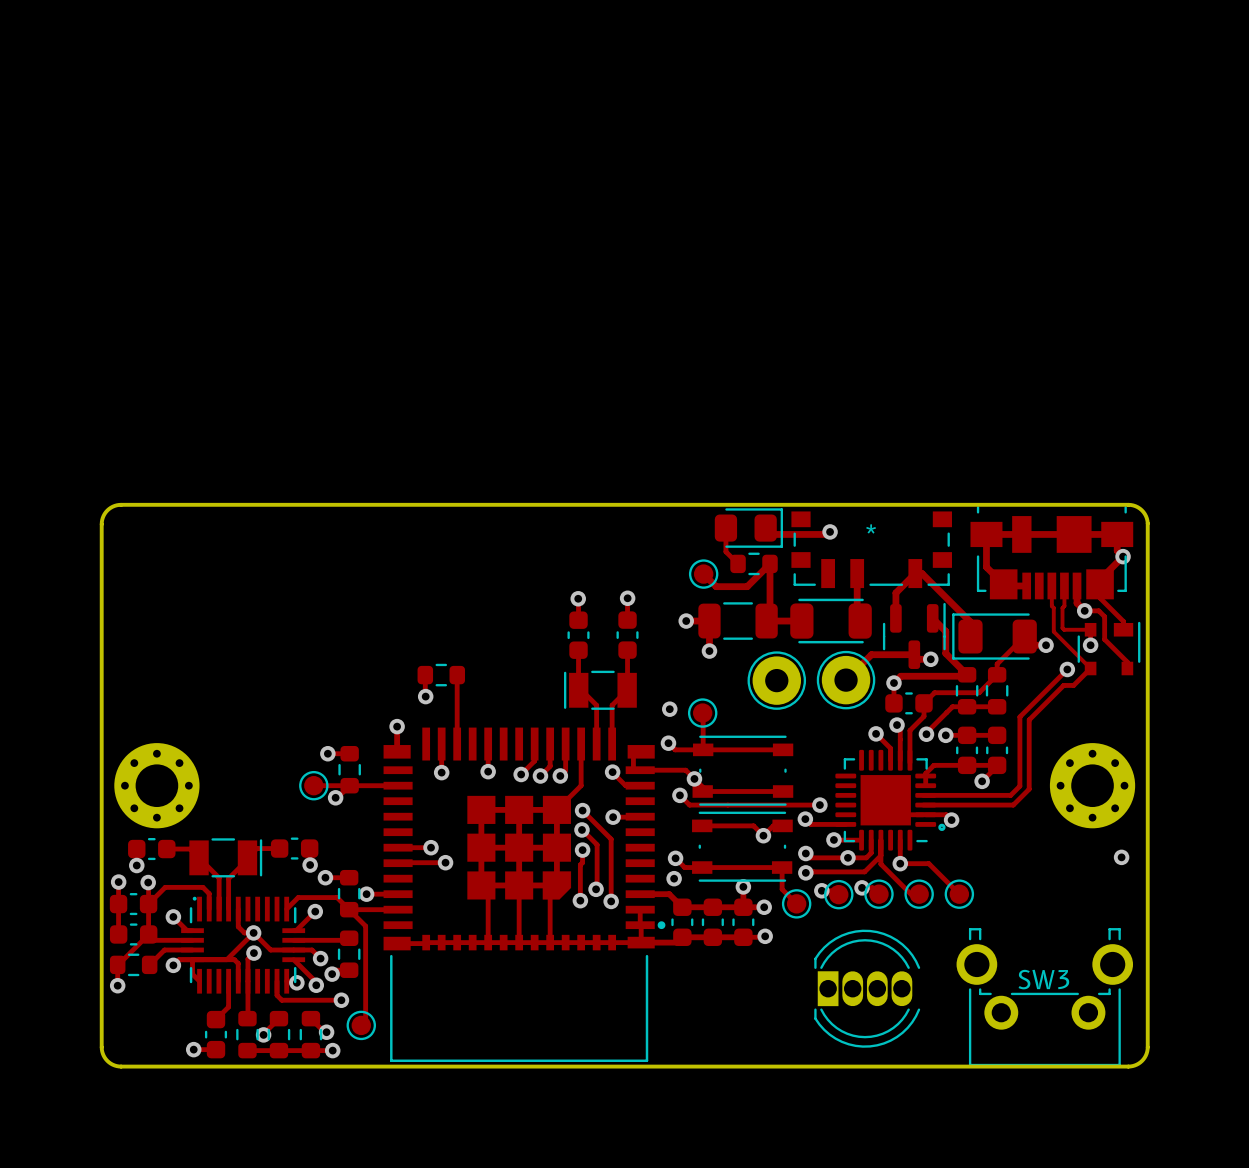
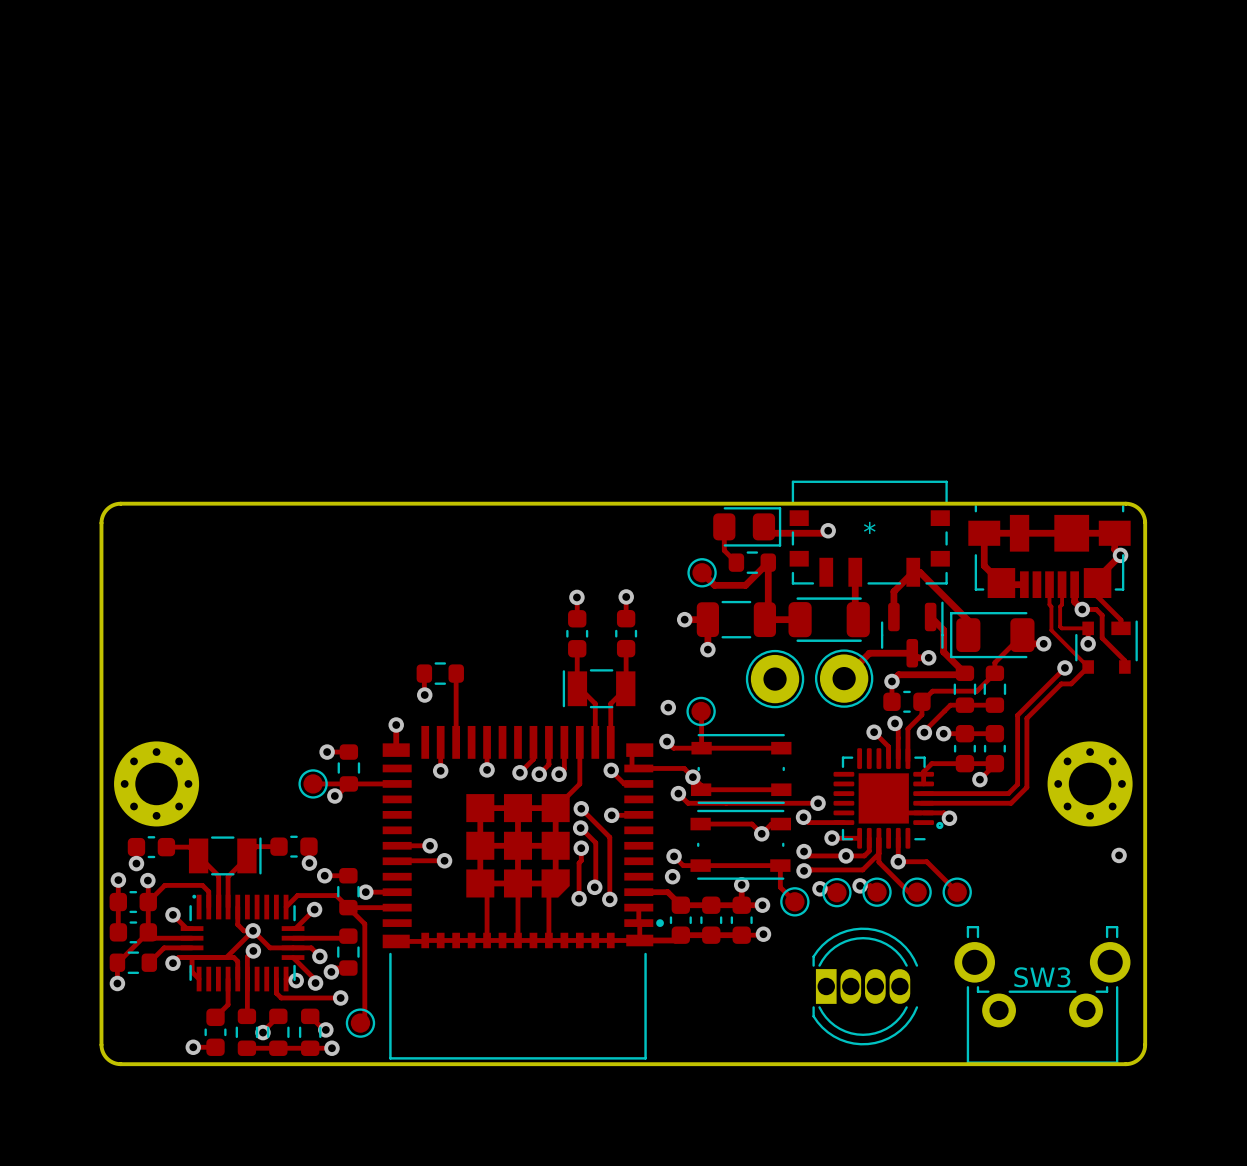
part footprint: [791, 511, 953, 589] -> [789, 480, 950, 587]

